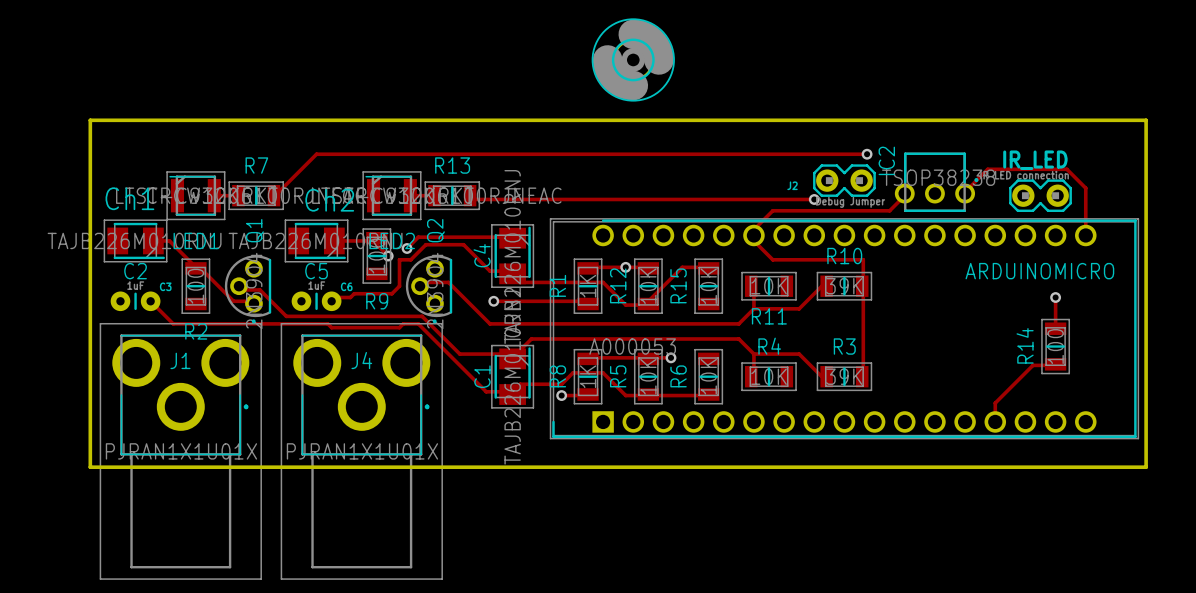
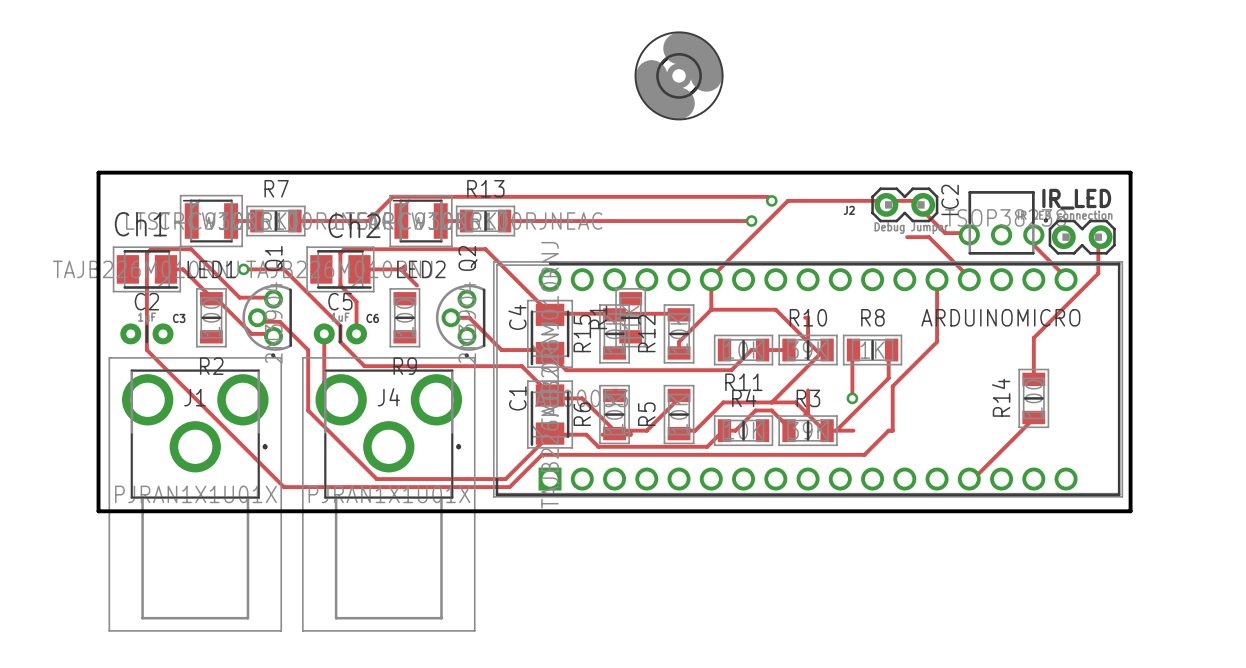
board edge: (90, 150) (90, 120) (1146, 120) (1146, 467) (1055, 467) -> (98, 172) (1130, 172) (1130, 511)
track: (867, 154) (316, 154) (275, 195) -> (771, 200) (767, 196) (392, 196) (368, 221) (296, 221)
via: (867, 154) -> none
via: none -> (771, 200)
IC2 position: (936, 182) -> (1003, 222)
track: (904, 193) (889, 210) (867, 210) -> (969, 279) (969, 277) (929, 237)
track: (965, 193) (987, 169) (1066, 169) (1085, 188) (1085, 235) -> none
track: (471, 195) (474, 199) (814, 199) -> (505, 221) (751, 221)
via: none -> (751, 221)
IR_LED position: (1040, 195) -> (1082, 237)
via: (814, 199) -> none
track: none -> (969, 234) (969, 233) (945, 233) (912, 200) (787, 200) (711, 277) (711, 309)
track: none -> (1033, 234) (1033, 245) (1066, 277) (1066, 279)
track: (846, 210) (772, 210) (753, 229) (753, 240) (772, 259) (863, 259) (862, 376) -> none
track: none -> (1100, 237) (1098, 237) (1098, 273) (1033, 337) (1033, 379)
track: (512, 238) (418, 237) (407, 248) -> none
via: none -> (243, 269)
via: (407, 248) -> none
track: none -> (937, 279) (937, 341) (892, 386) (892, 430) (888, 430) (864, 454) (541, 454) (509, 487) (283, 487) (146, 350) (146, 253) (150, 249) (191, 249) (239, 297) (273, 299)
R9 position: (376, 256) -> (404, 317)
via: (388, 256) -> none
C4 rotation: 0° (512, 256) -> 180° (550, 333)
C4 position: (512, 256) -> (550, 333)
via: (625, 267) -> none
track: (588, 268) (648, 268) -> none
track: (708, 268) (682, 267) (648, 301) (648, 305) (625, 305) (603, 282) -> (679, 314) (646, 313)
ARDUINOMICRO name position: ARDUINOMICRO (1039, 271) -> ARDUINOMICRO (1000, 317)
track: none -> (711, 309) (679, 341) (679, 352)
track: none -> (711, 309) (775, 309) (820, 354)
track: (520, 282) (512, 274) (512, 271) (490, 271) (463, 244) (425, 244) (410, 259) (399, 259) (399, 286) (391, 293) (354, 293) (350, 297) (335, 297) (331, 301) -> (550, 314) (485, 249) (344, 249) (340, 253) (340, 285) (356, 301) (356, 333)
track: (422, 286) (425, 282) (448, 282) (490, 323) (738, 323) (753, 308) (799, 308) (821, 286) (826, 286) -> (453, 317) (469, 317) (501, 350) (550, 350) (550, 354) (566, 370) (731, 370) (751, 350) (789, 350)
R12 position: (648, 286) -> (679, 333)
R15 position: (708, 286) -> (614, 333)
R11 position: (769, 286) -> (743, 350)
R10 position: (844, 286) -> (808, 350)
track: (1055, 297) (1055, 328) -> none
via: (1055, 297) -> none
track: (150, 301) (173, 323) (327, 323) (331, 327) (399, 327) (403, 323) (418, 323) (486, 391) (512, 391) (520, 384) (561, 384) (572, 372) (603, 372) (625, 395) (708, 394) -> none
track: none -> (324, 333) (324, 382) (341, 399)
track: (493, 301) (588, 301) (588, 304) -> none
via: (493, 301) -> none
track: (286, 316) (422, 316) (459, 354) (516, 354) (512, 358) -> (308, 350) (308, 410) (376, 479) (505, 479) (550, 434) (586, 434) (598, 446) (707, 446) (723, 430) (735, 430) (755, 410) (771, 410) (791, 430) (789, 430)
track: none -> (827, 350) (824, 350) (771, 402)
track: none -> (853, 350) (852, 398)
track: none -> (891, 350) (888, 350) (888, 378) (836, 430)
ARDUINOMICRO position: (844, 328) -> (808, 379)
R14 position: (1055, 346) -> (1033, 398)
track: (512, 357) (531, 338) (738, 338) (753, 354) (799, 354) (821, 376) (826, 376) -> (550, 394) (521, 366) (364, 366) (340, 341) (340, 325) (283, 269) (243, 269)
track: (671, 357) (588, 358) -> none
via: (671, 357) -> none
track: none -> (550, 395) (550, 398) (582, 398) (614, 430) (646, 430) (679, 398) (679, 395)
via: none -> (852, 398)
track: (1055, 364) (1032, 365) (995, 403) (995, 421) -> none
C1 rotation: 0° (512, 376) -> 180° (550, 414)
R8 rotation: 0° (588, 376) -> 90° clockwise (872, 350)
R8 position: (588, 376) -> (872, 350)
R5 position: (648, 376) -> (679, 414)
R6 position: (708, 376) -> (614, 414)
R4 position: (769, 376) -> (743, 430)
R3 position: (844, 376) -> (808, 430)
track: none -> (1033, 417) (973, 479) (969, 479)
track: none -> (853, 430) (824, 430) (795, 402) (723, 402) (695, 430) (679, 430) (679, 433)
via: (561, 395) -> none

